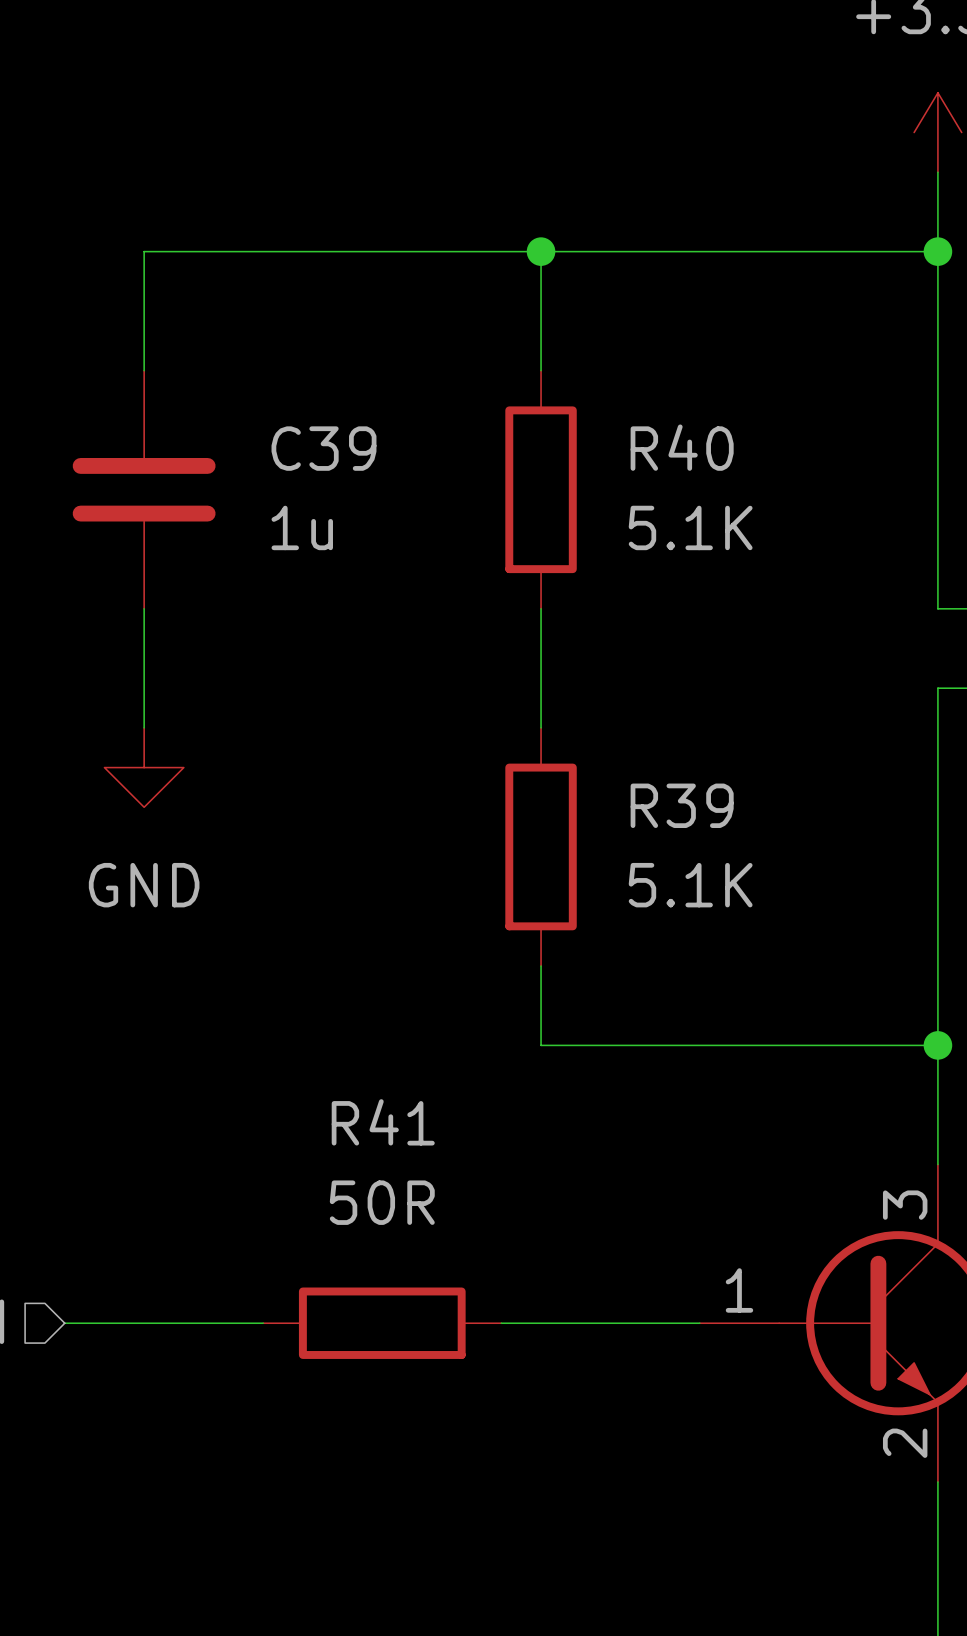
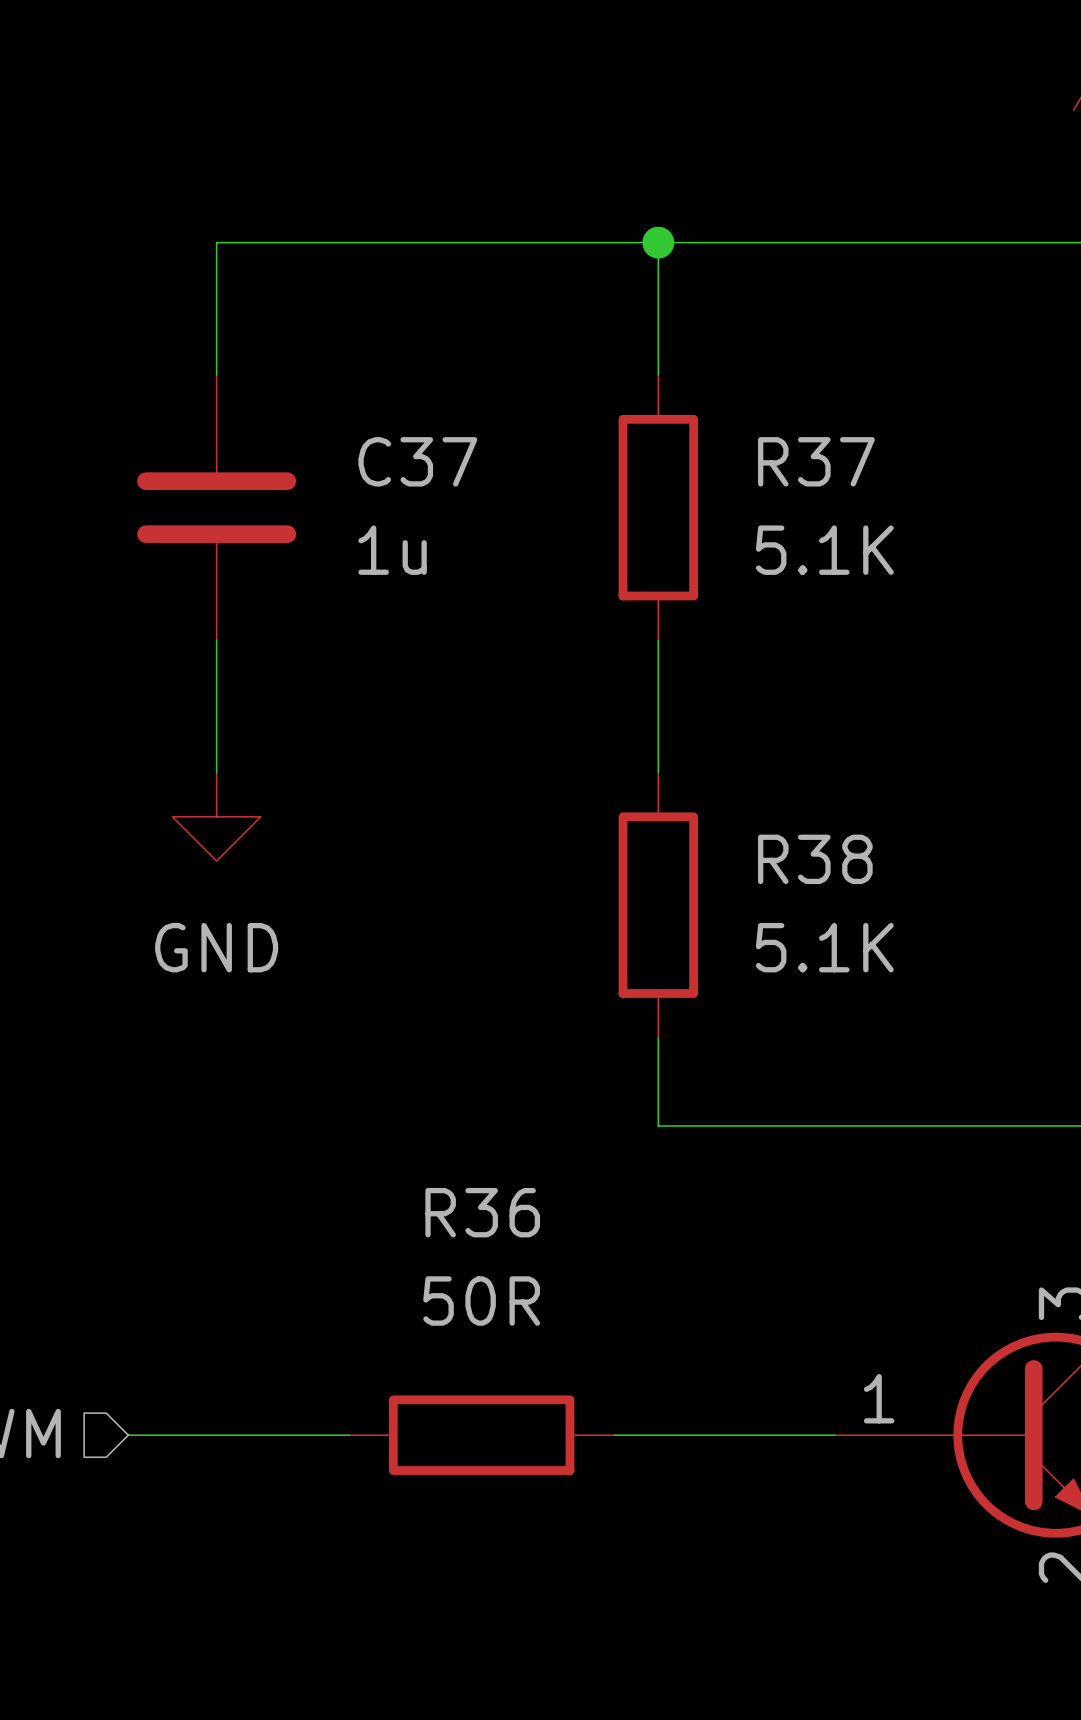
R40 name: R40 (682, 447) -> R37 (816, 461)
C39 name: C39 (323, 448) -> C37 (417, 461)
R39 name: R39 (682, 805) -> R38 (815, 859)
R41 name: R41 (383, 1122) -> R36 (482, 1212)

